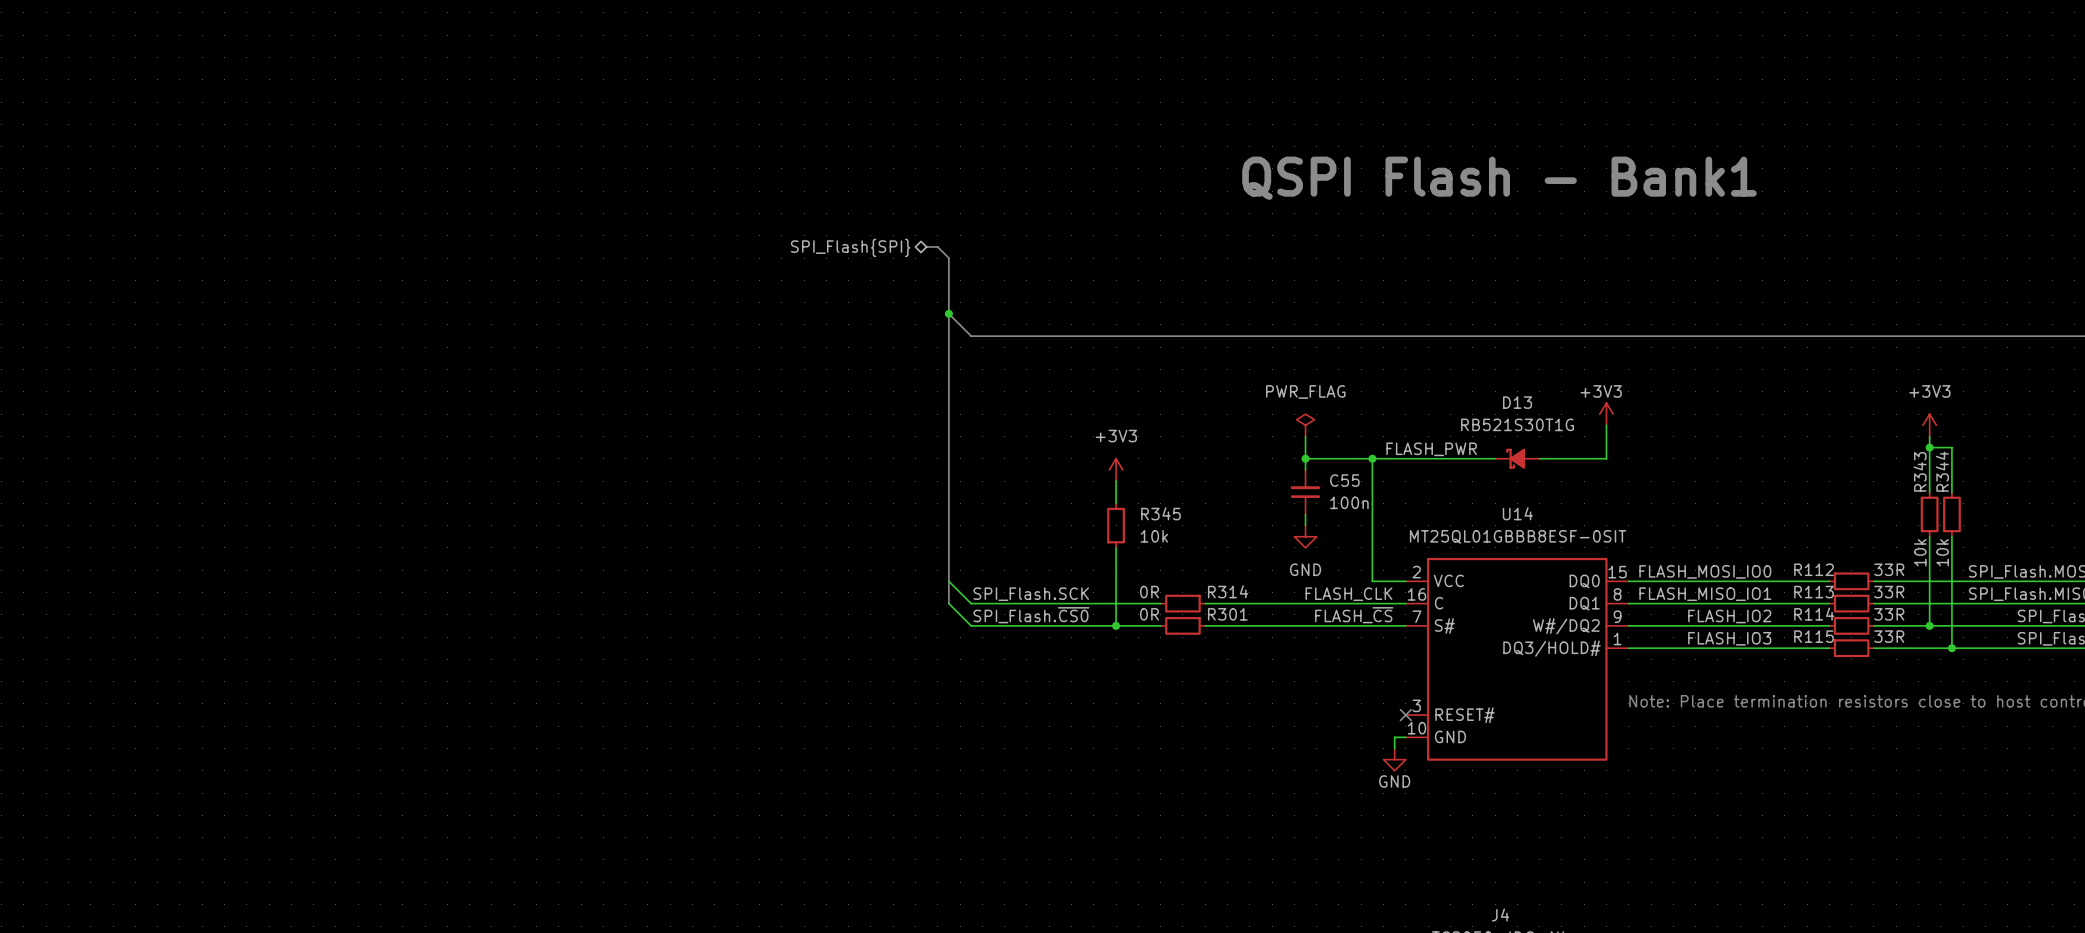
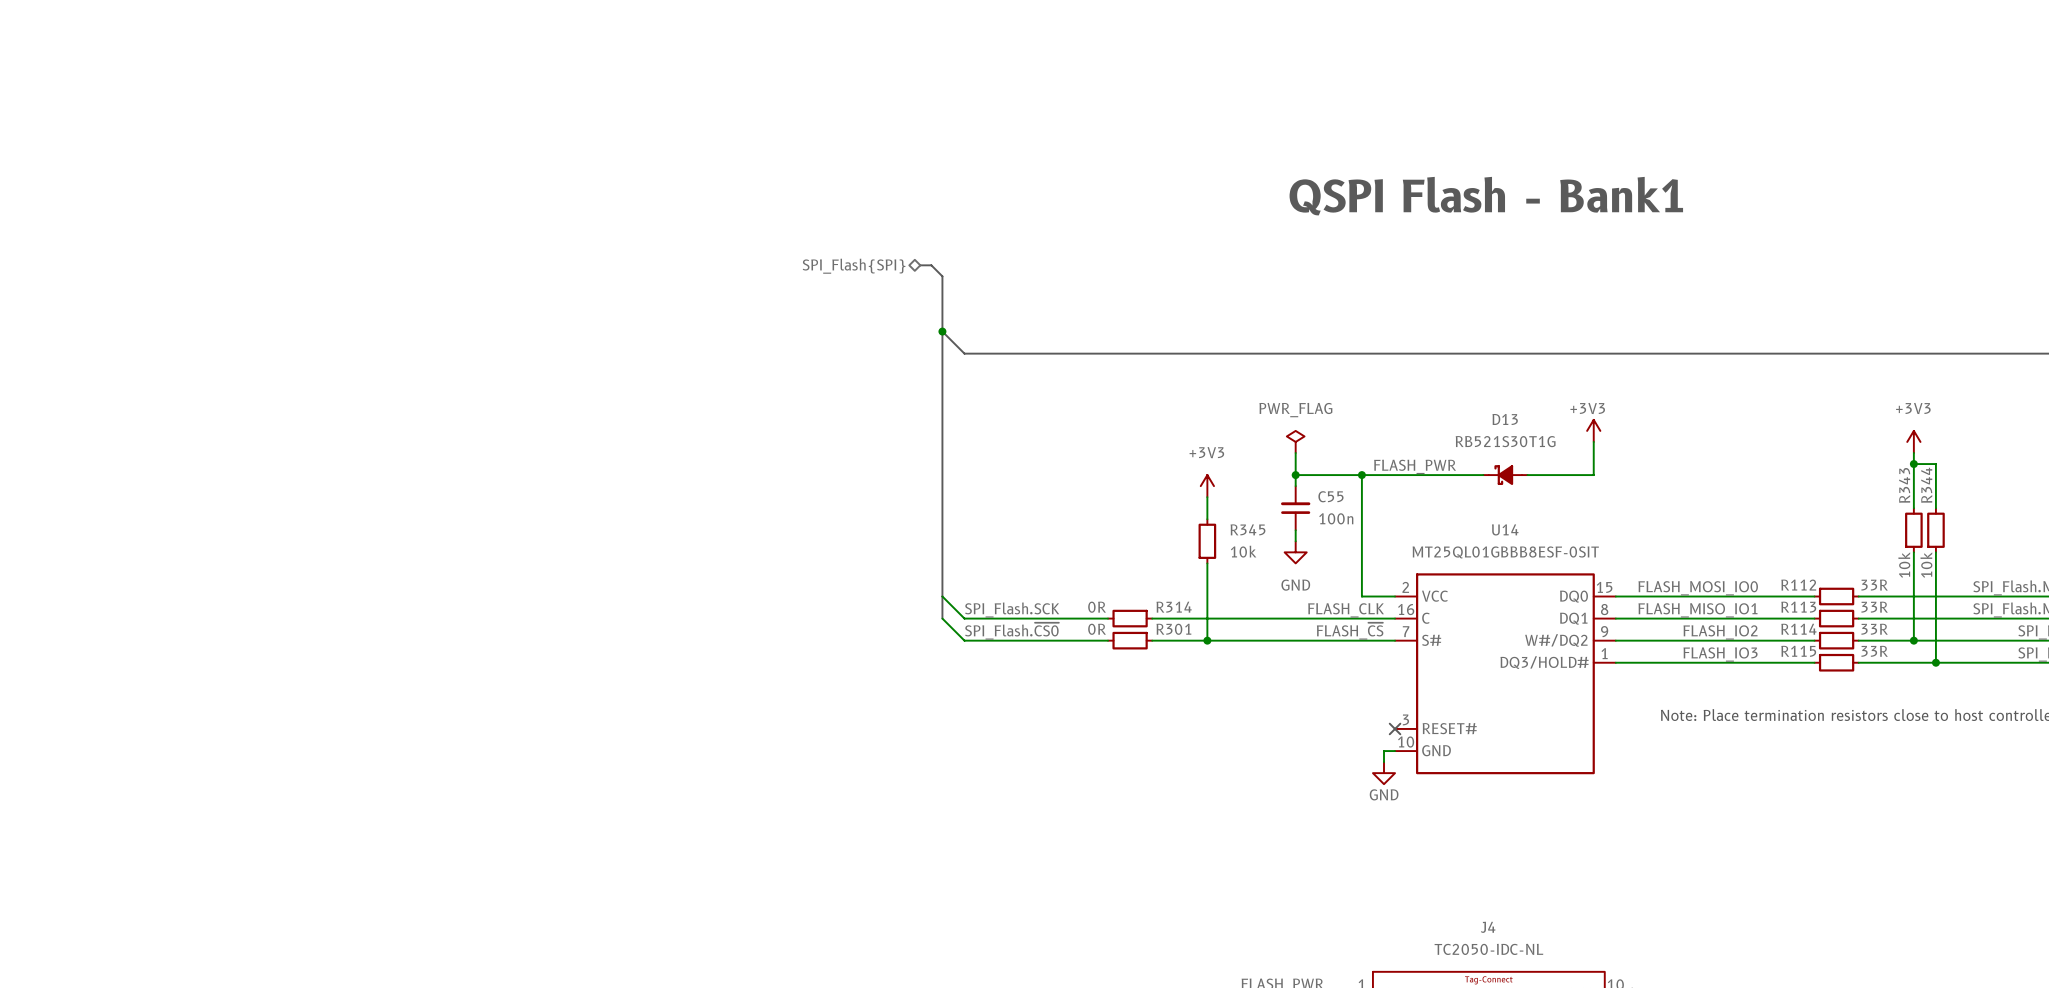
power symbol position: +3V3 (1116, 469) -> +3V3 (1207, 486)
wire: (1116, 481) (1116, 503) -> (1207, 497) (1207, 519)
R345 position: (1116, 525) -> (1207, 541)
wire: (1116, 547) (1116, 625) (1160, 625) -> (1196, 640) (1152, 640)
wire: none -> (1207, 563) (1207, 640)
wire: (1116, 603) (1160, 603) -> (1196, 618) (1152, 618)
R314 position: (1182, 603) -> (1130, 618)
junction: (1116, 625) -> none
R301 position: (1182, 625) -> (1130, 640)
junction: none -> (1207, 640)

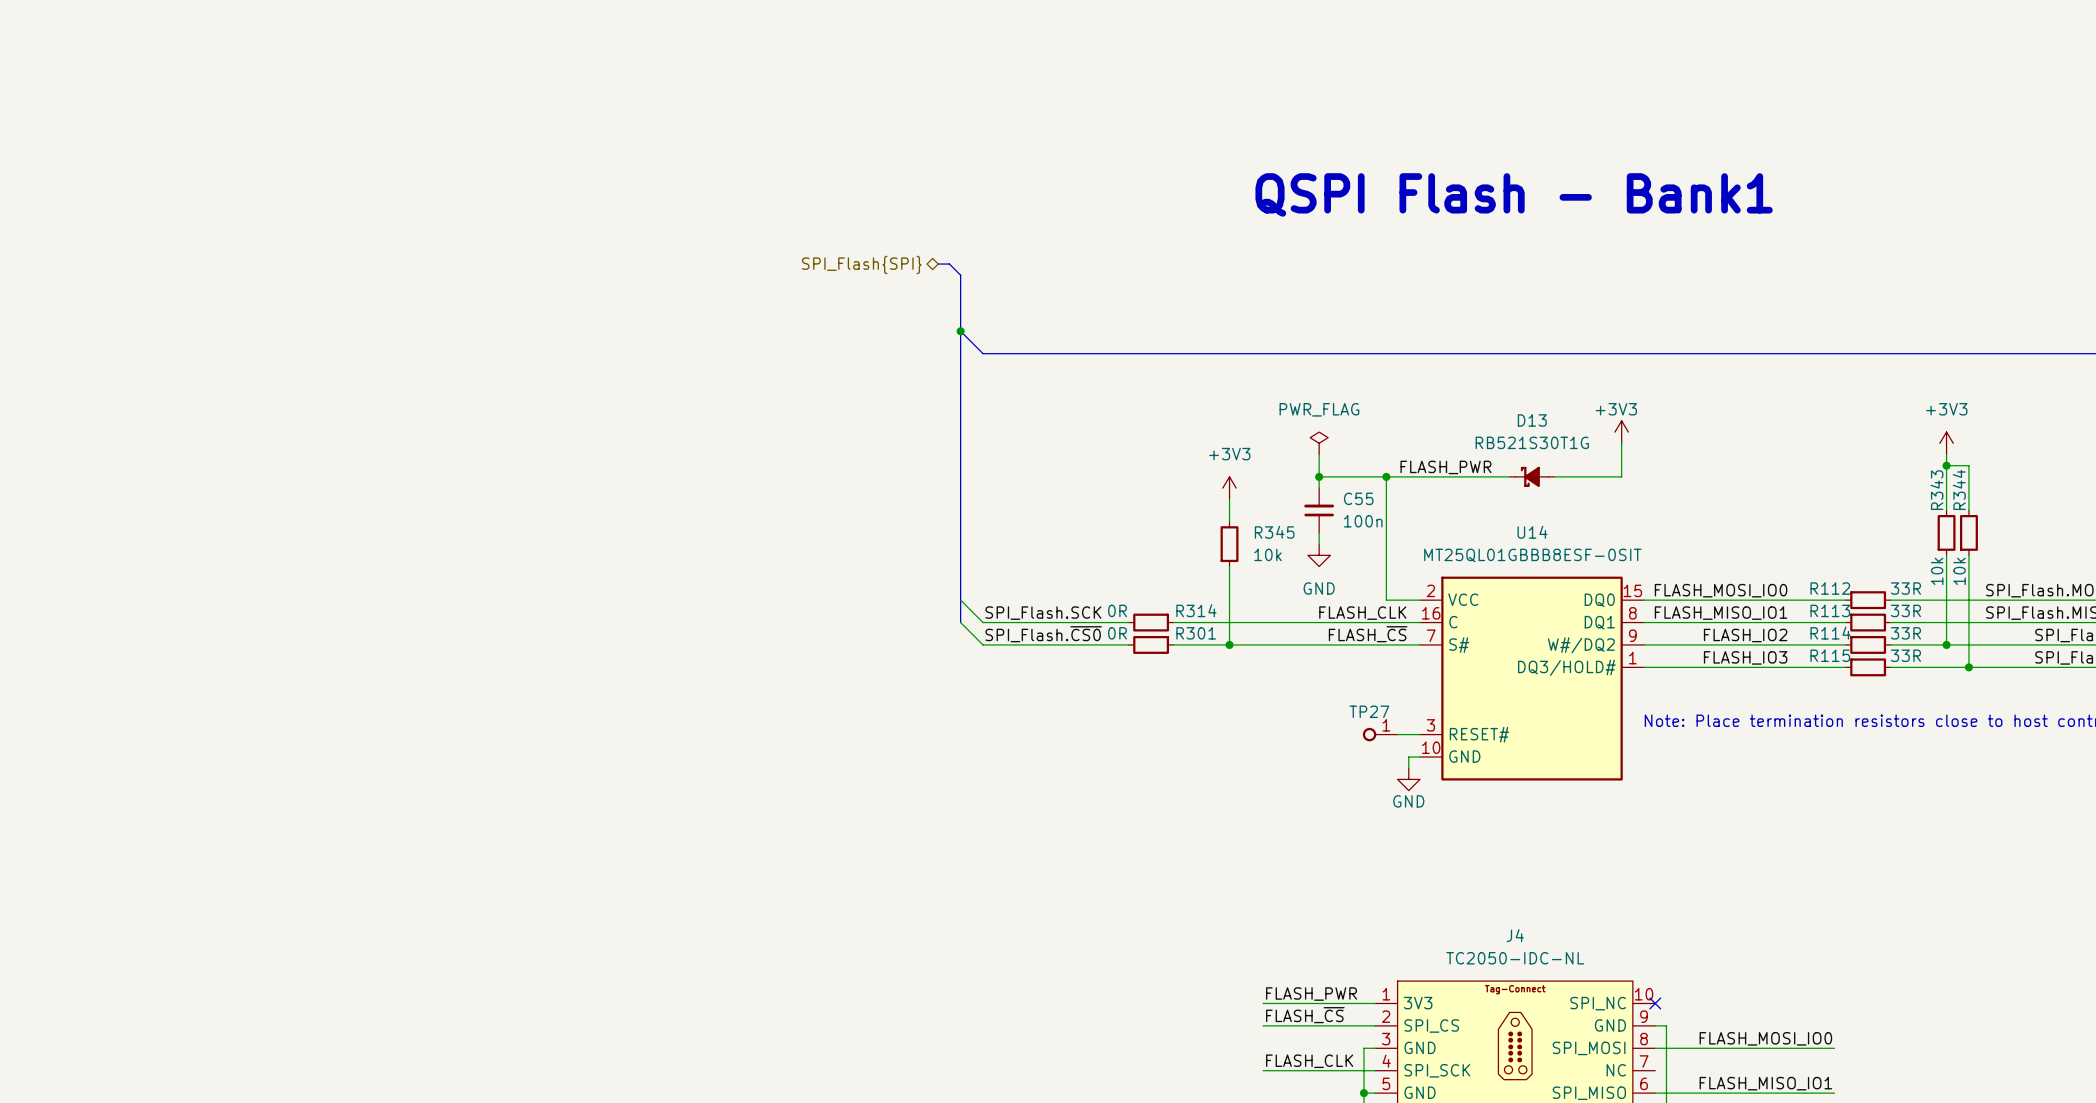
TP27: none -> (1380, 734)
wire: none -> (1397, 734) (1419, 734)
no-connect mark: (1395, 728) -> none

